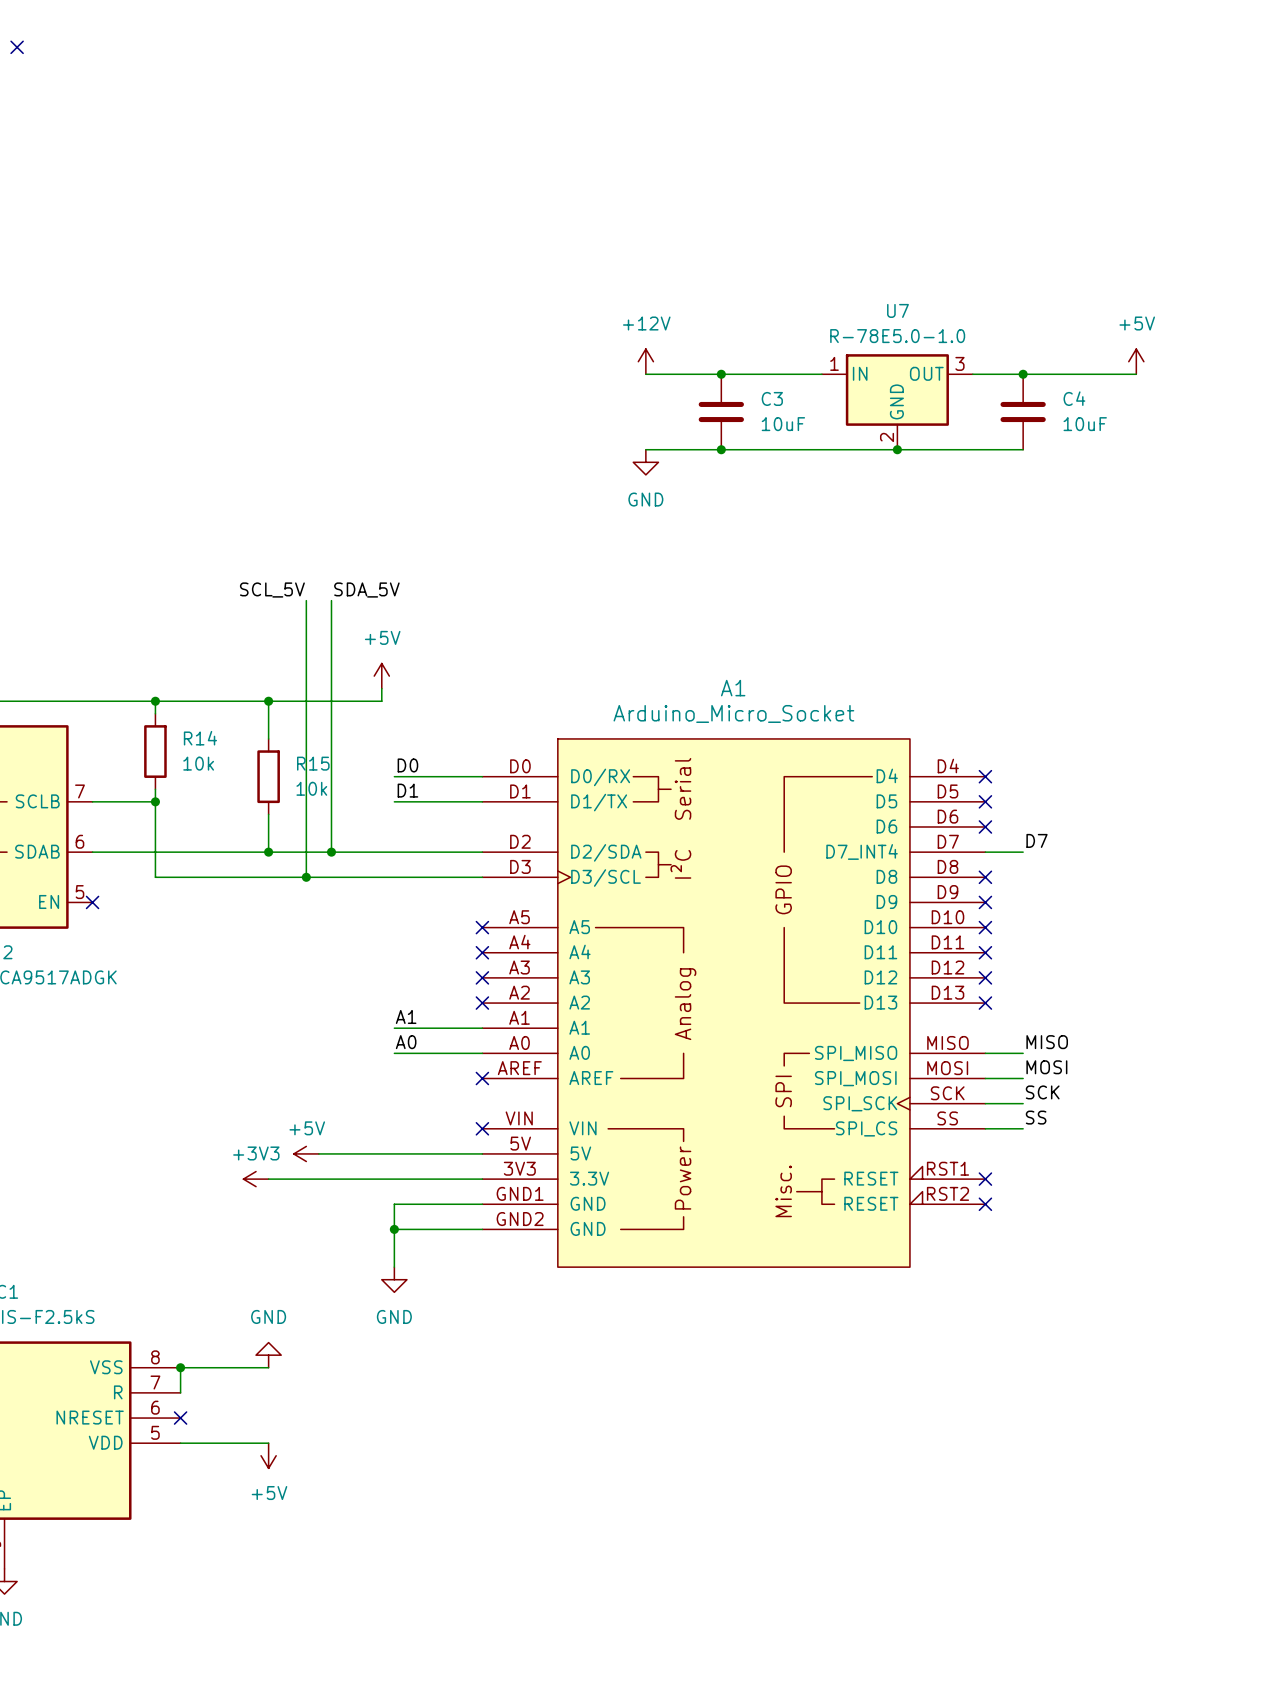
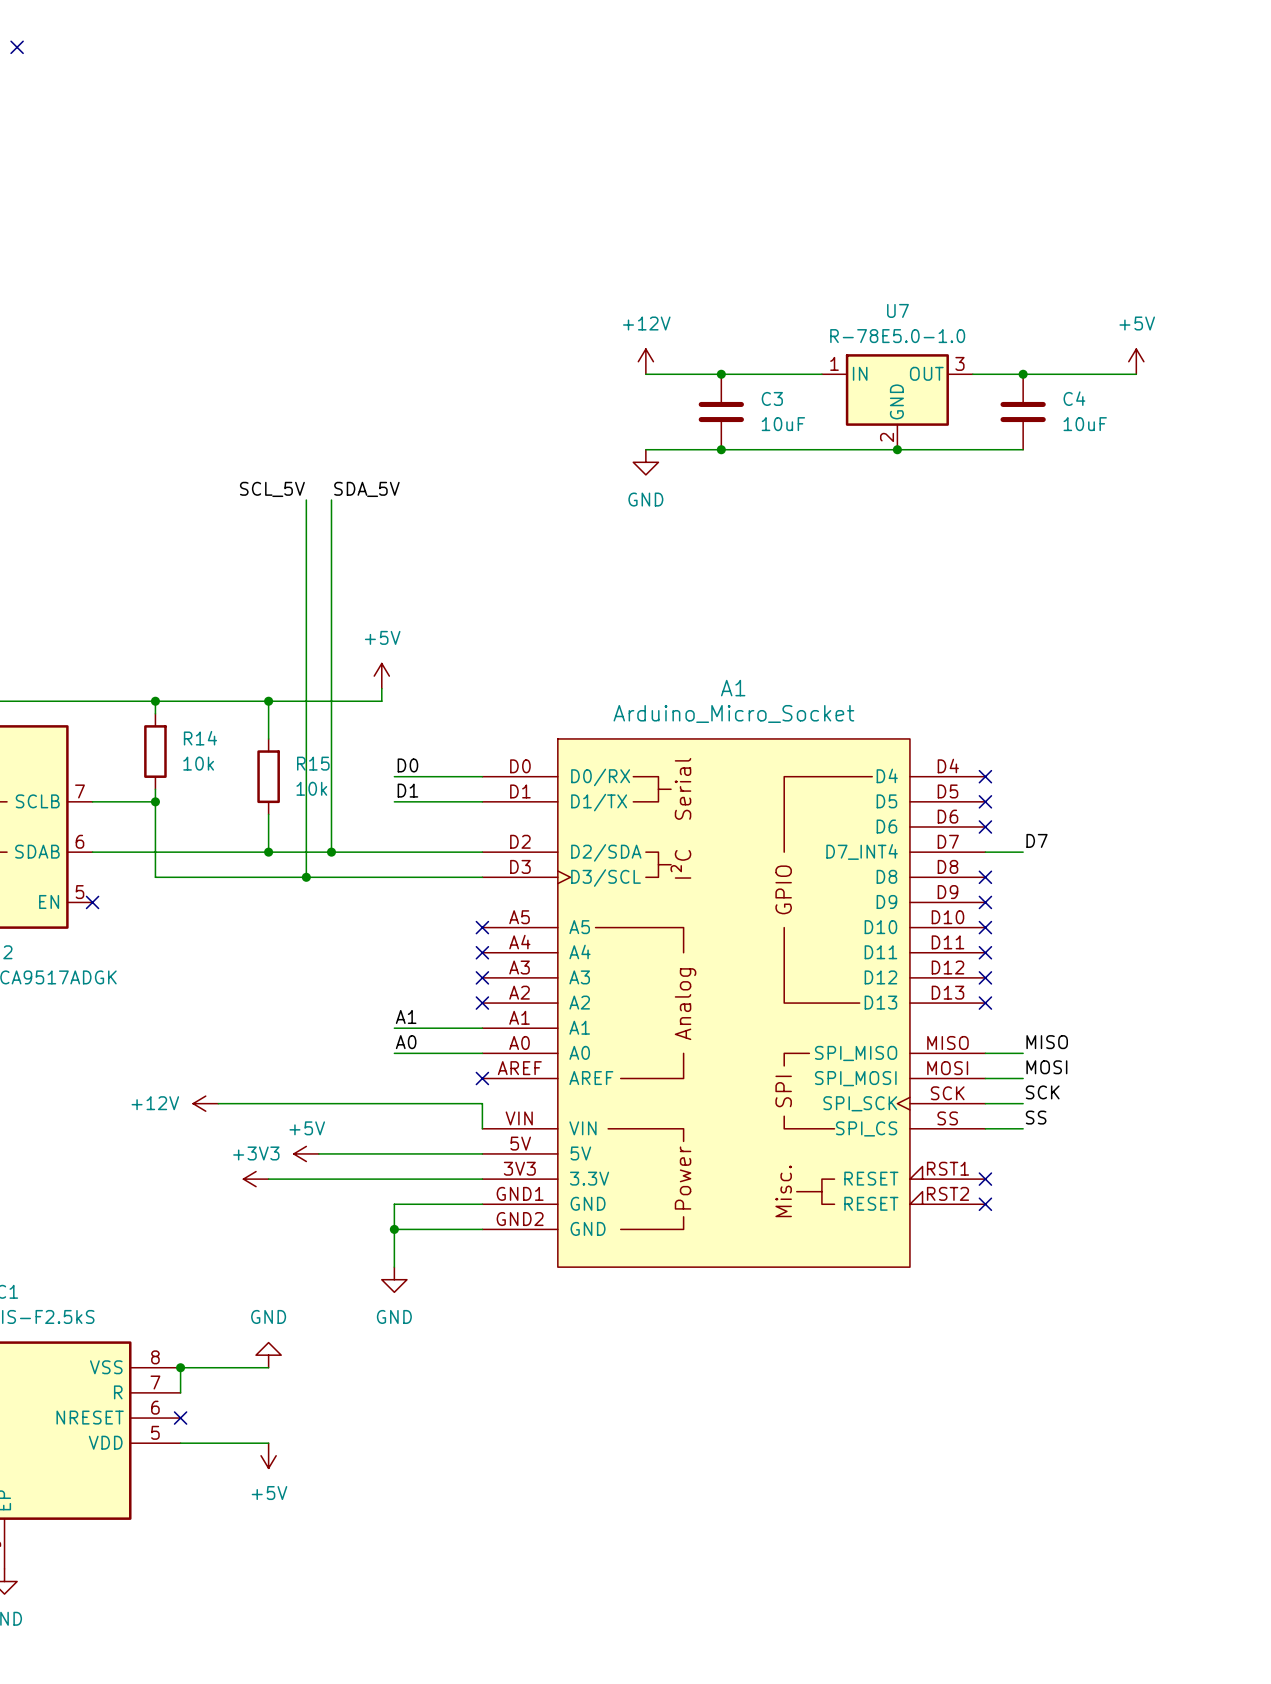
wire: none -> (306, 500) (306, 600)
wire: none -> (331, 500) (331, 600)
label position: SCL_5V (272, 590) -> SCL_5V (272, 489)
label position: SDA_5V (366, 590) -> SDA_5V (366, 489)
power symbol: none -> +12V (205, 1103)
wire: none -> (218, 1103) (482, 1103) (482, 1128)
no-connect mark: (482, 1128) -> none

